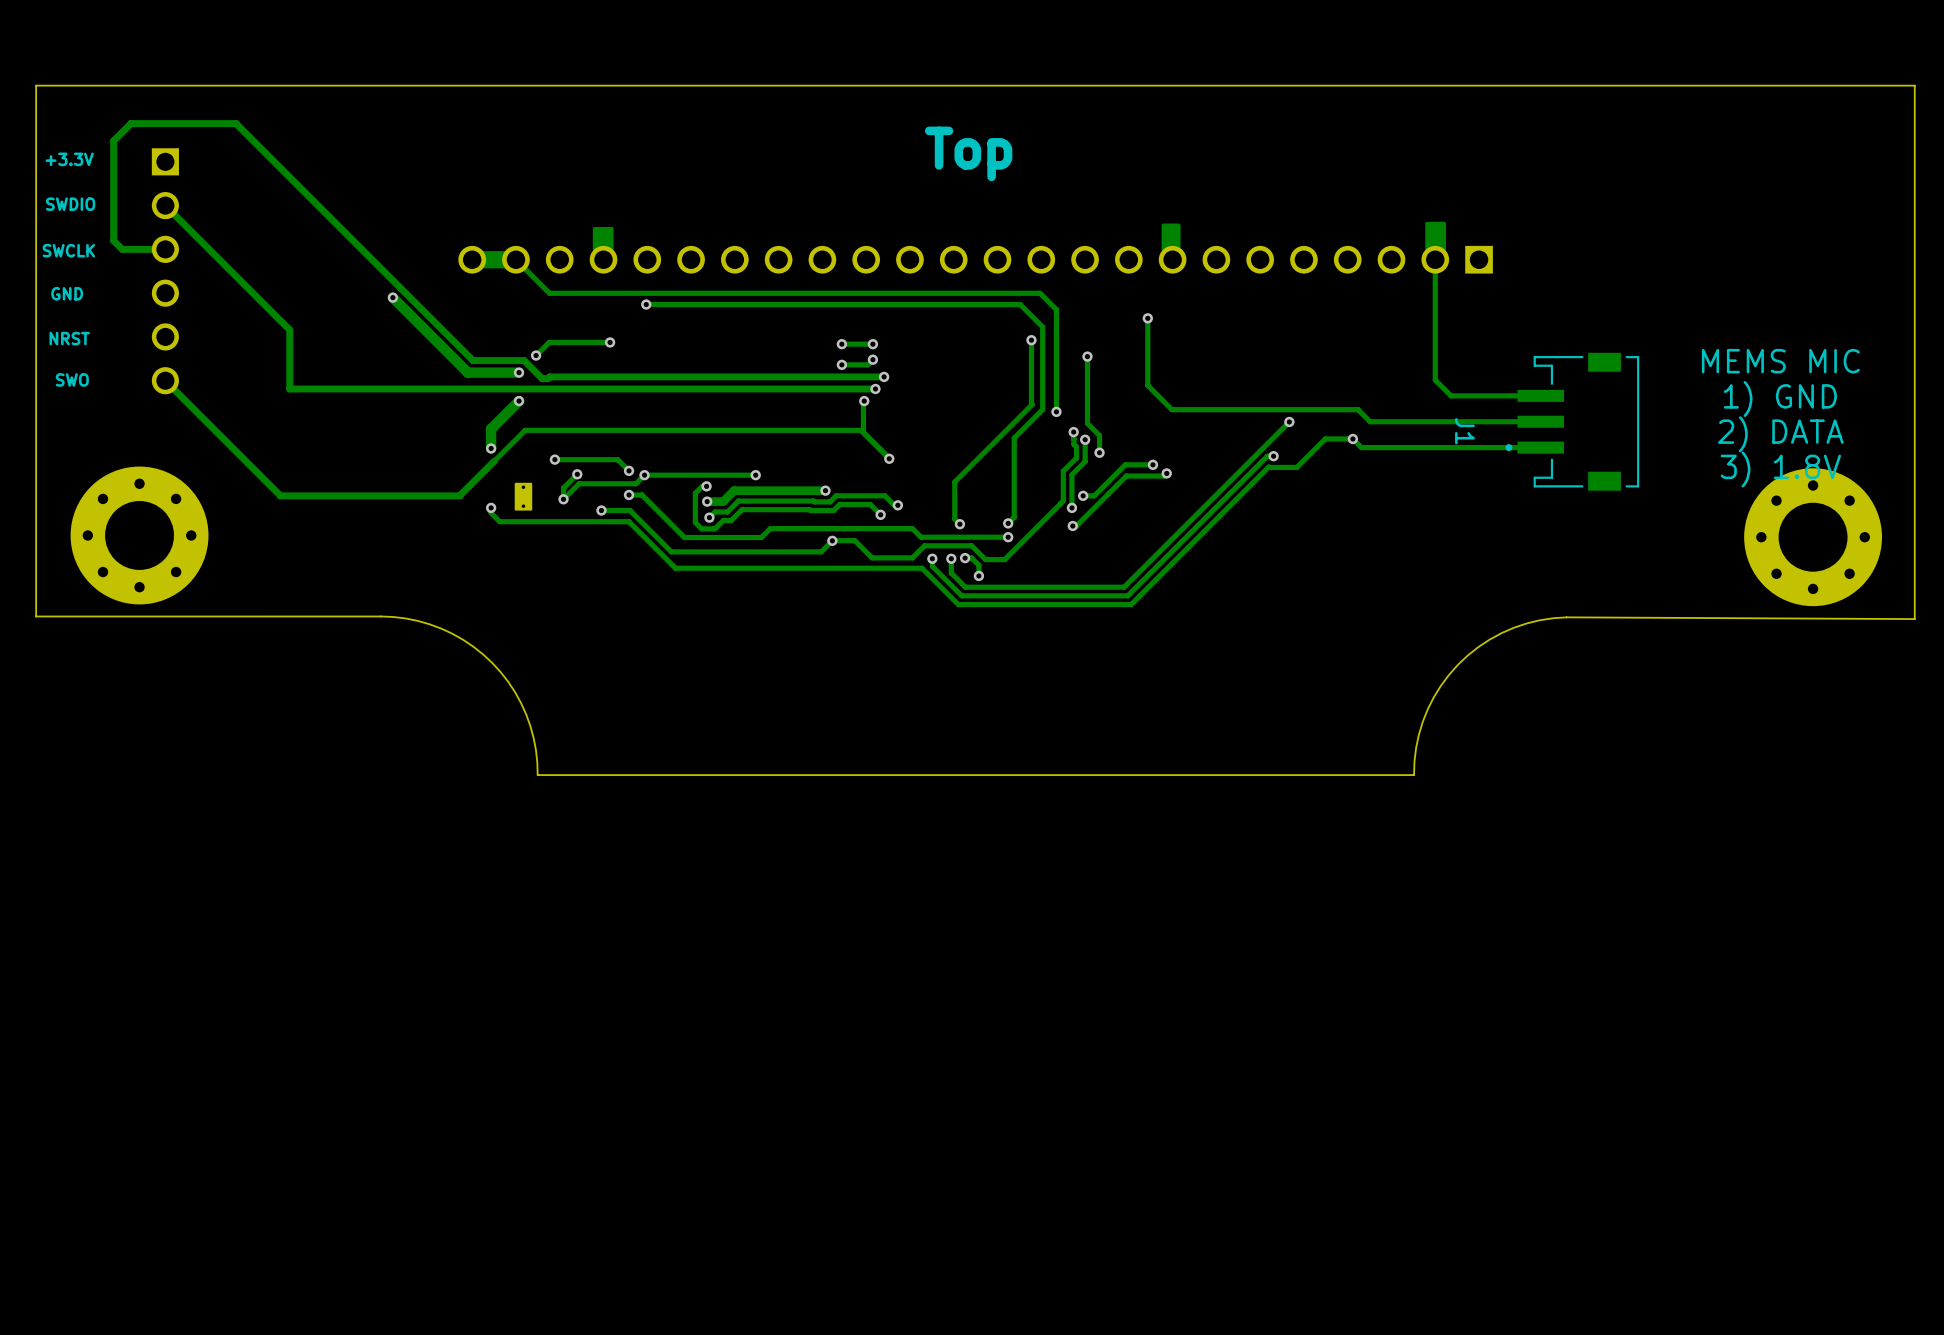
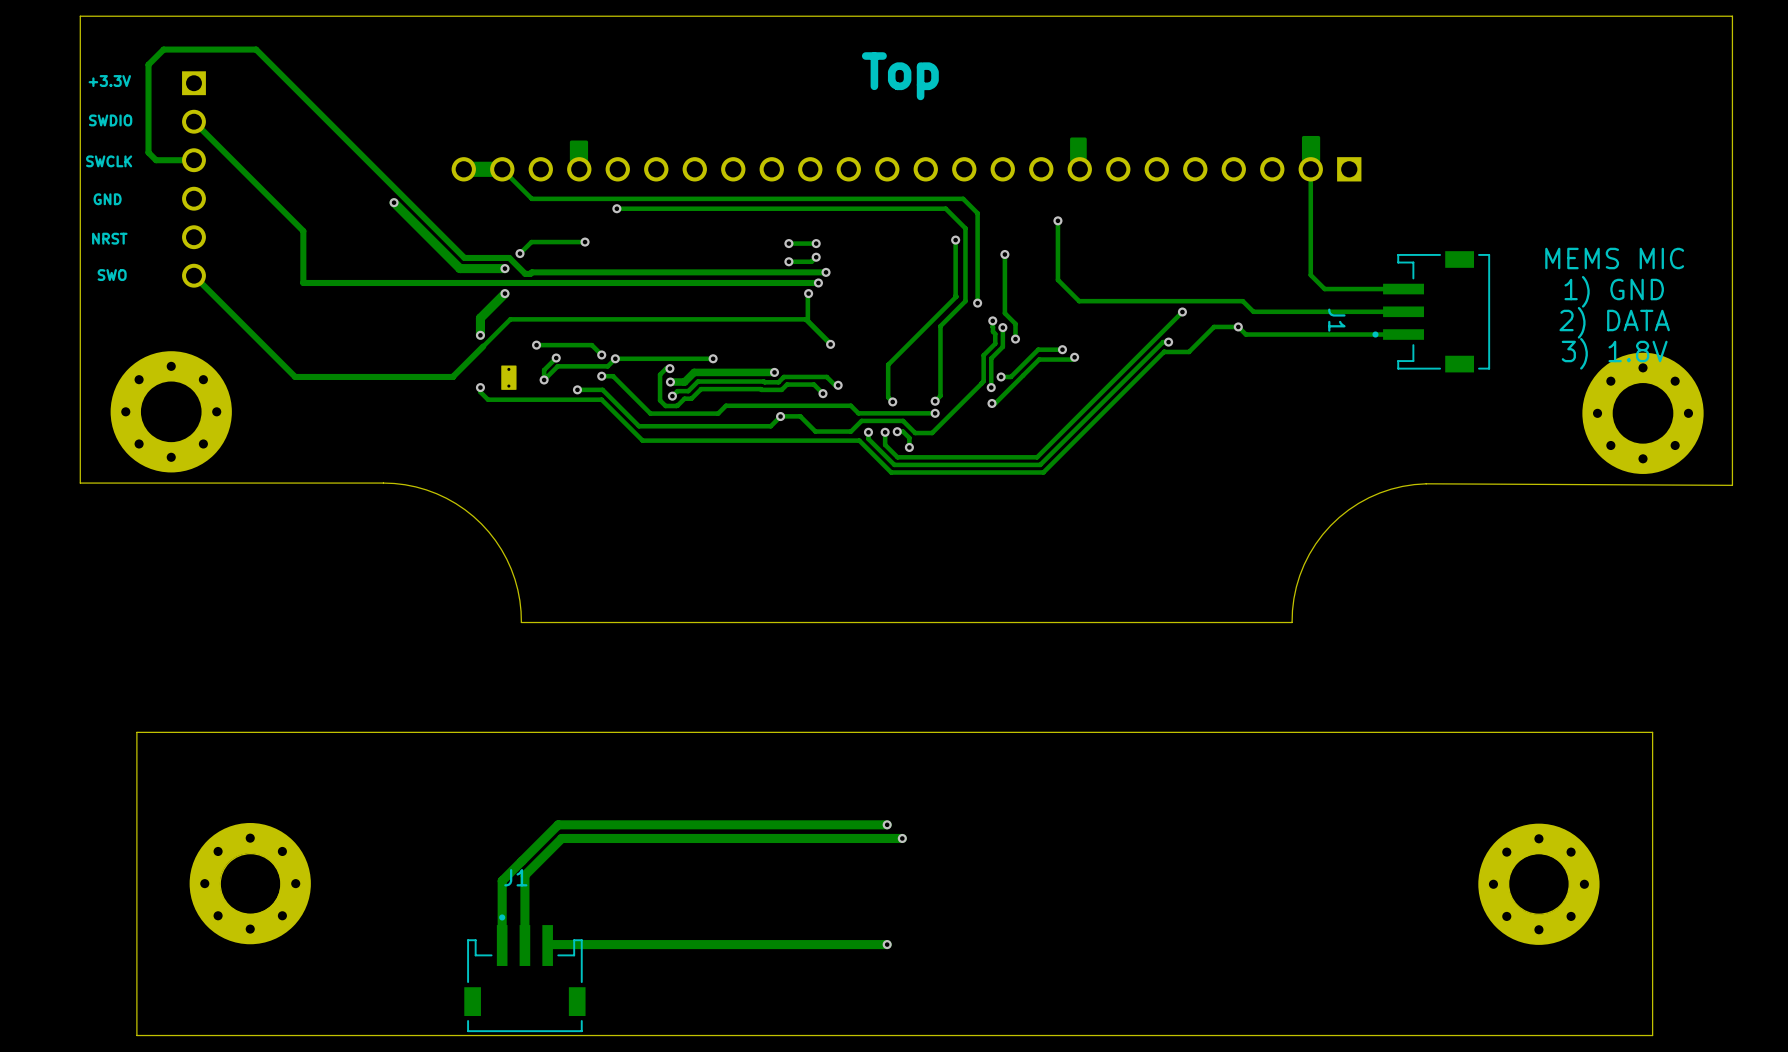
board edge: none -> (1652, 732) (136, 732) (136, 1035) (1652, 1035) (1652, 732)
track: none -> (887, 824) (558, 824) (502, 880) (502, 945)
via: none -> (887, 824)
track: none -> (902, 838) (561, 838) (524, 875) (524, 945)
via: none -> (902, 838)
round board edge: none -> [219, 853, 282, 915]
round board edge: none -> [1508, 853, 1570, 915]
part: none -> (250, 883)
part: none -> (1538, 884)
track: none -> (887, 944) (547, 945)
via: none -> (887, 944)
J1: none -> (524, 973)

